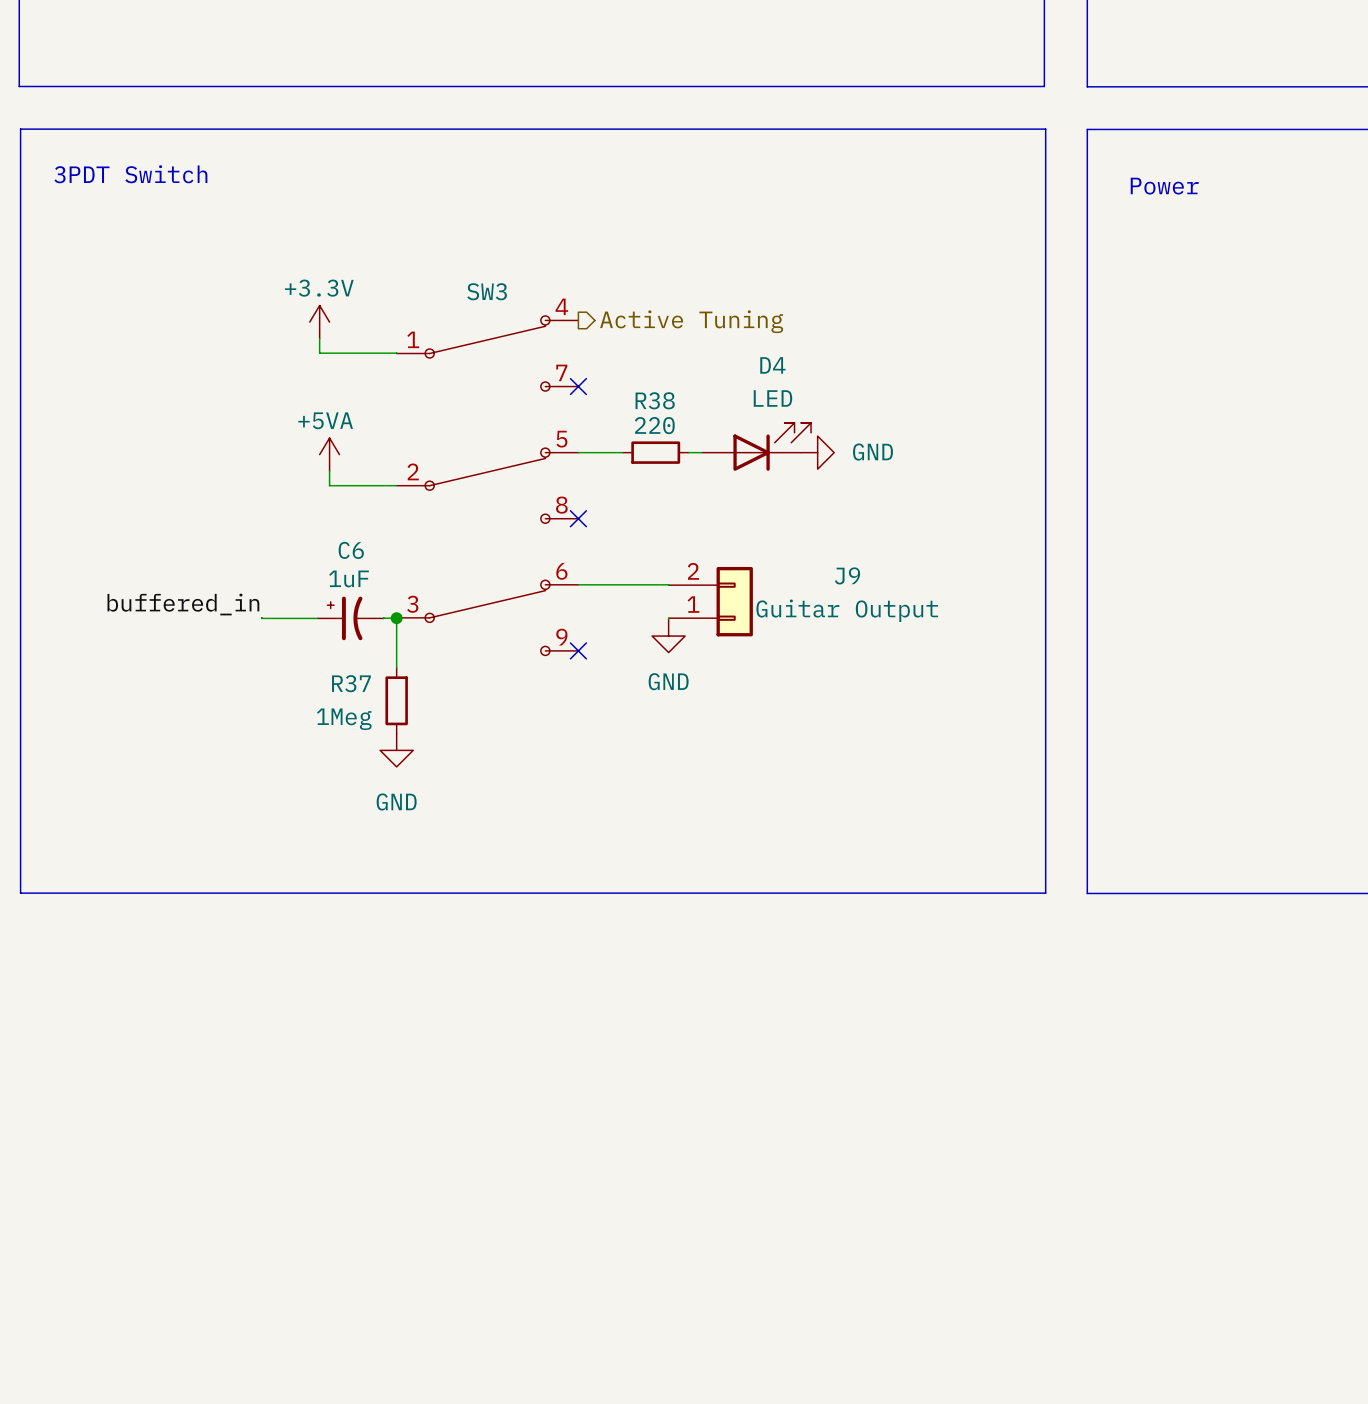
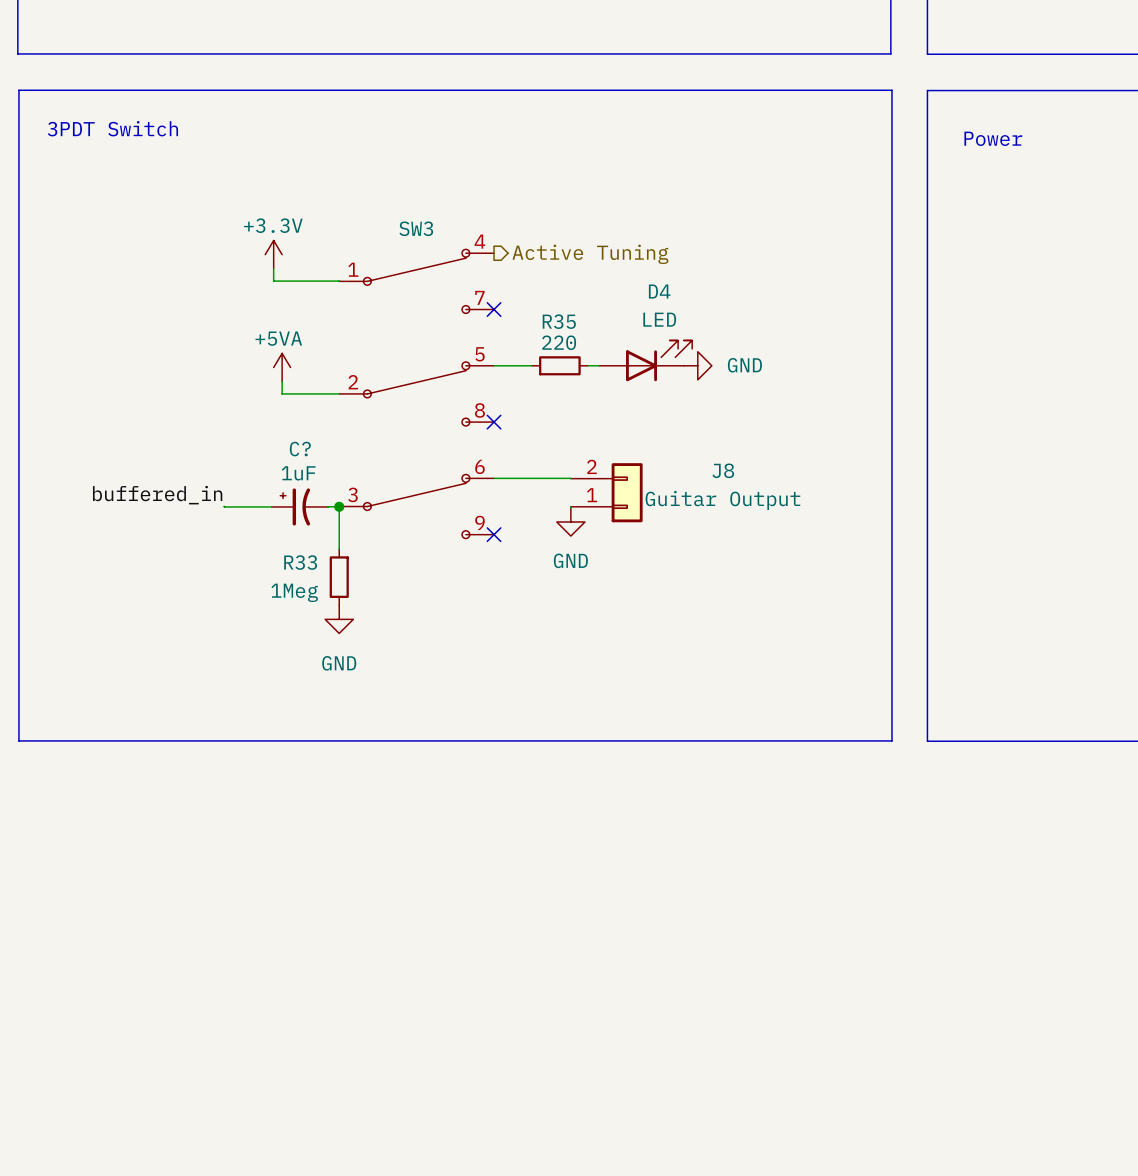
R38 name: R38 (655, 400) -> R35 (559, 321)
C6 name: C6 (351, 550) -> C? (300, 449)
J9 name: J9 (847, 575) -> J8 (723, 470)
R37 name: R37 (351, 683) -> R33 (300, 562)

